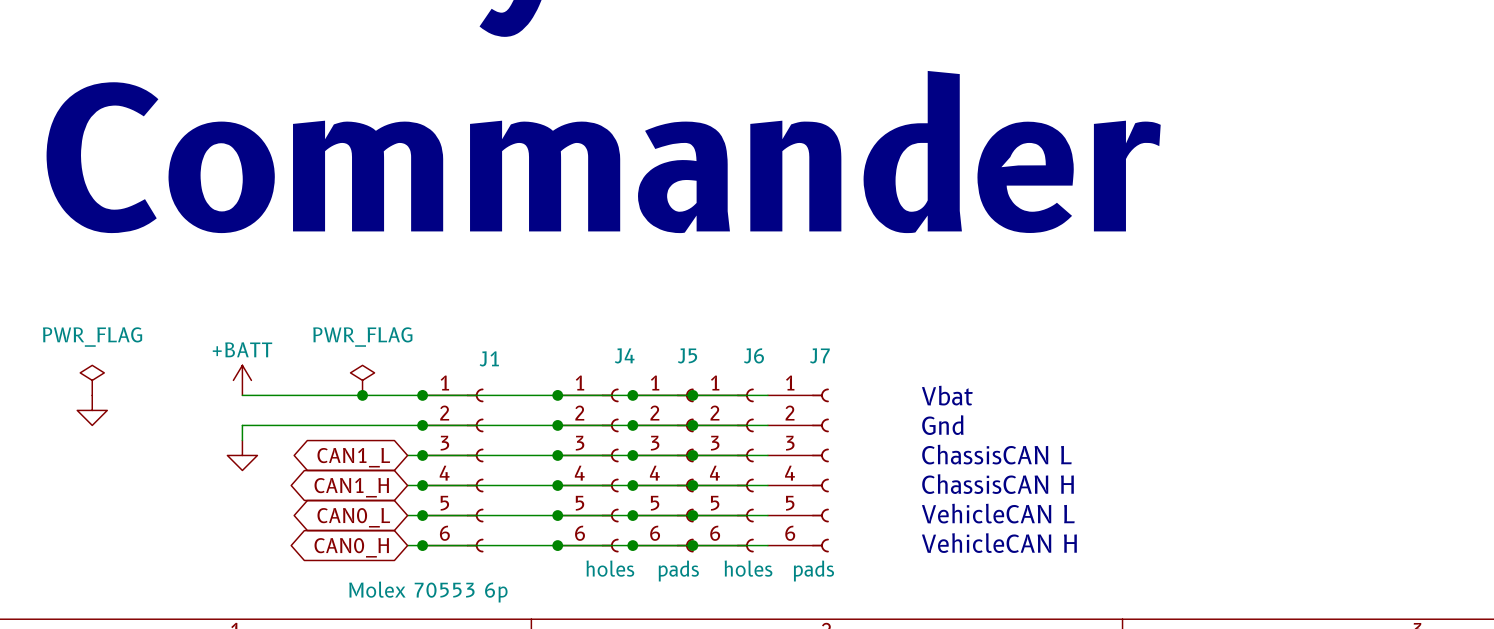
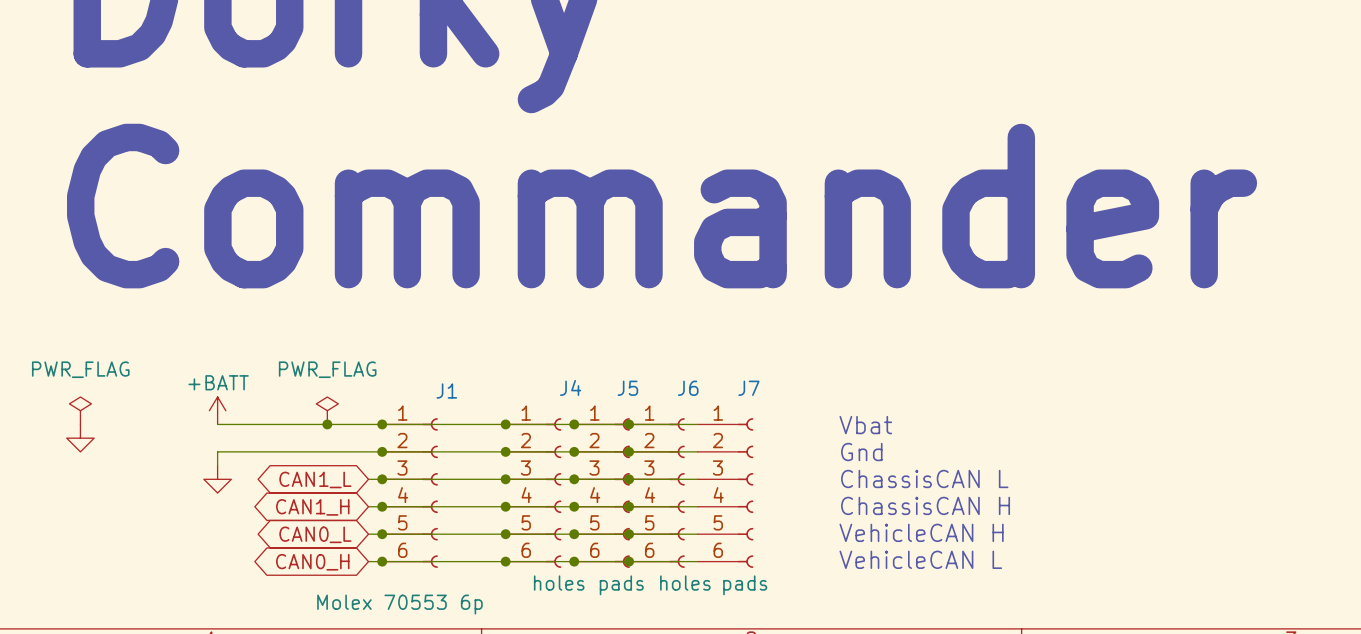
text: VehicleCAN L (998, 513) -> VehicleCAN H (921, 532)
text: VehicleCAN H (999, 543) -> VehicleCAN L (920, 559)

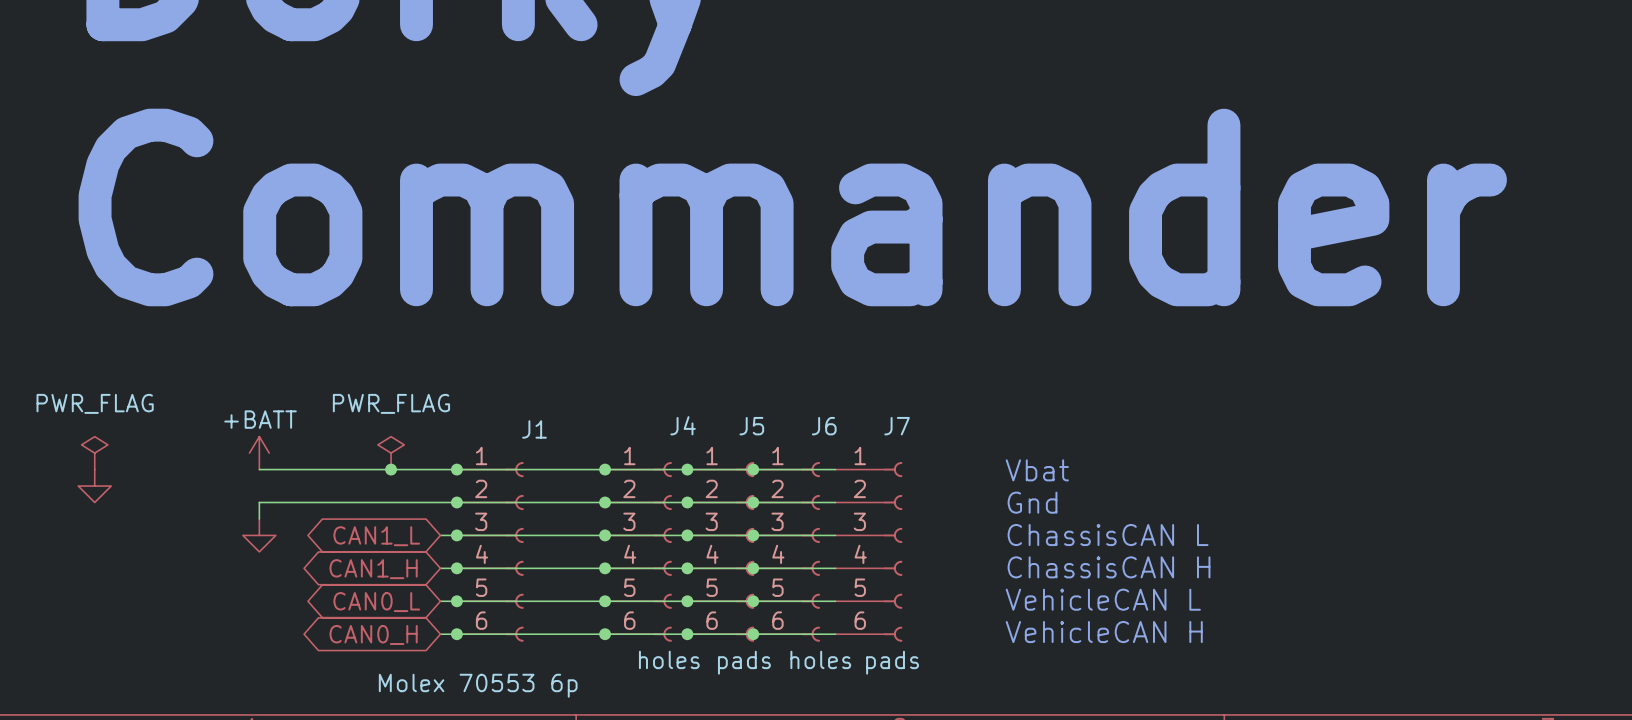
text: VehicleCAN H (921, 532) -> VehicleCAN L (1103, 599)
text: VehicleCAN L (920, 559) -> VehicleCAN H (1104, 632)

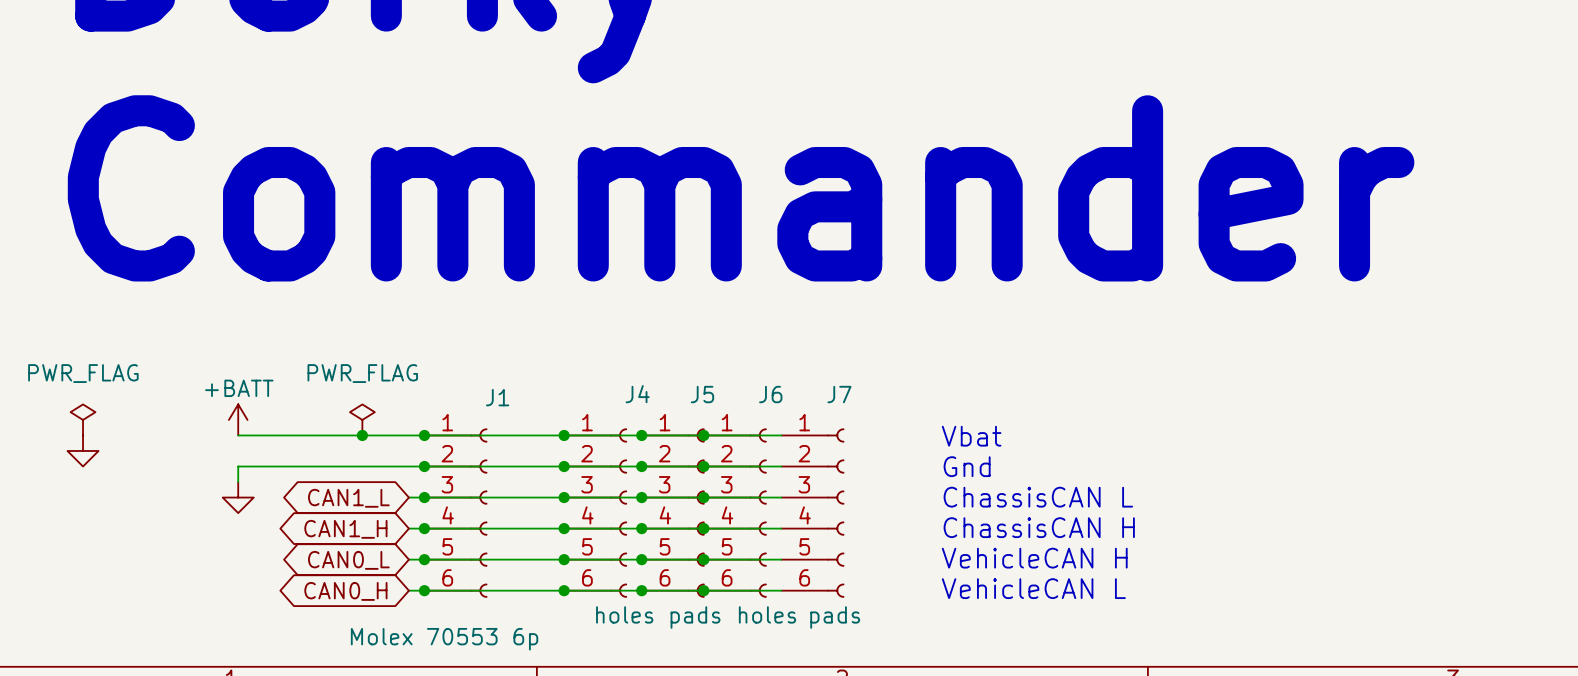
text: VehicleCAN L (1103, 599) -> VehicleCAN H (1034, 558)
text: VehicleCAN H (1104, 632) -> VehicleCAN L (1033, 588)

